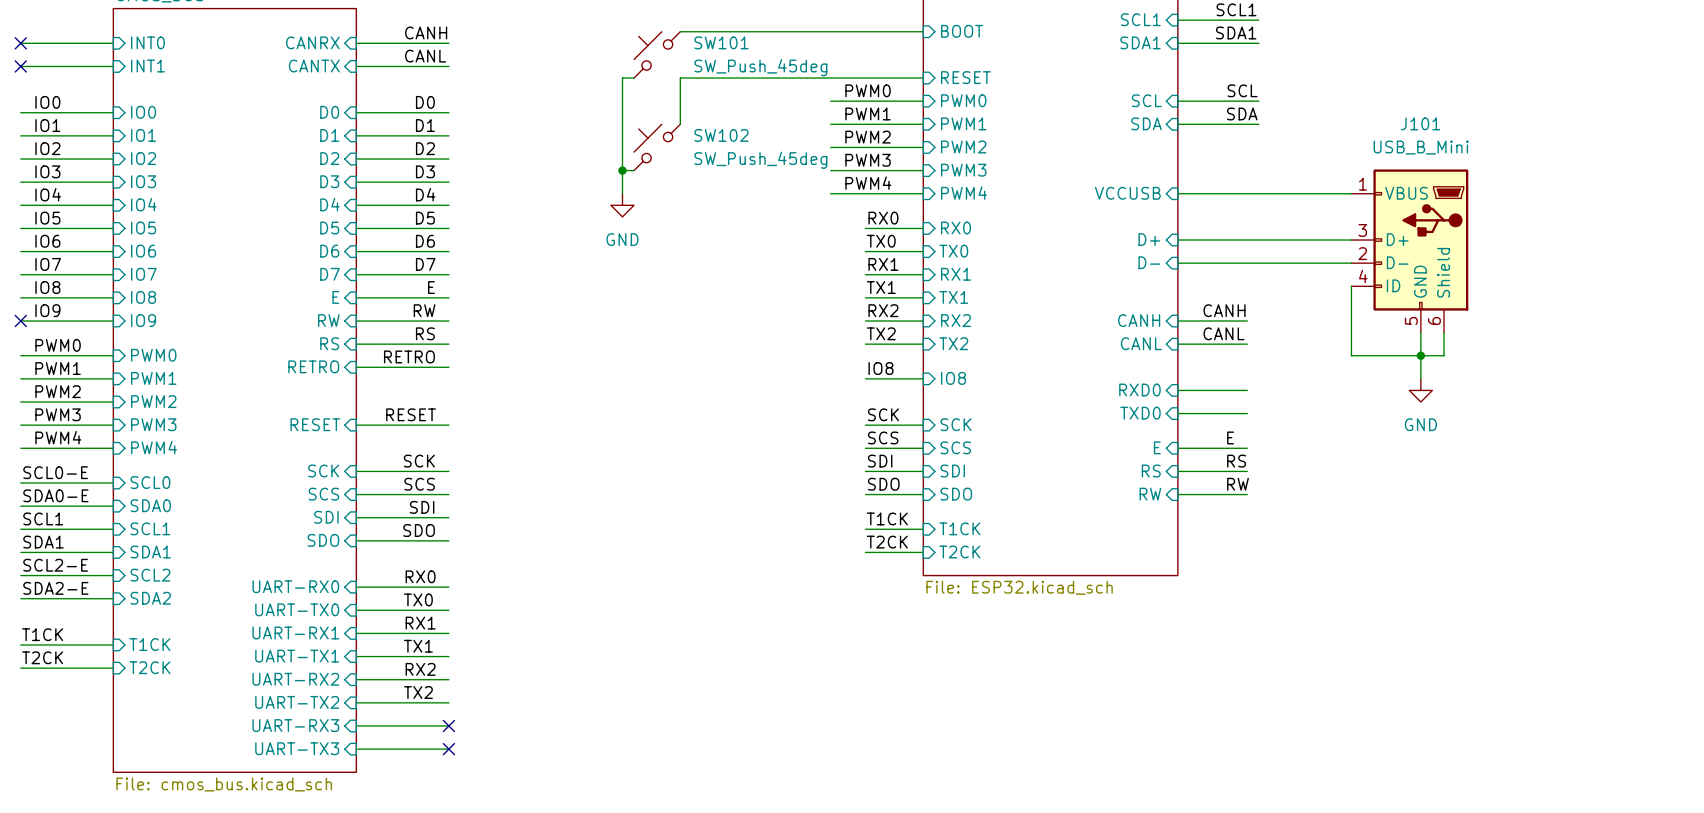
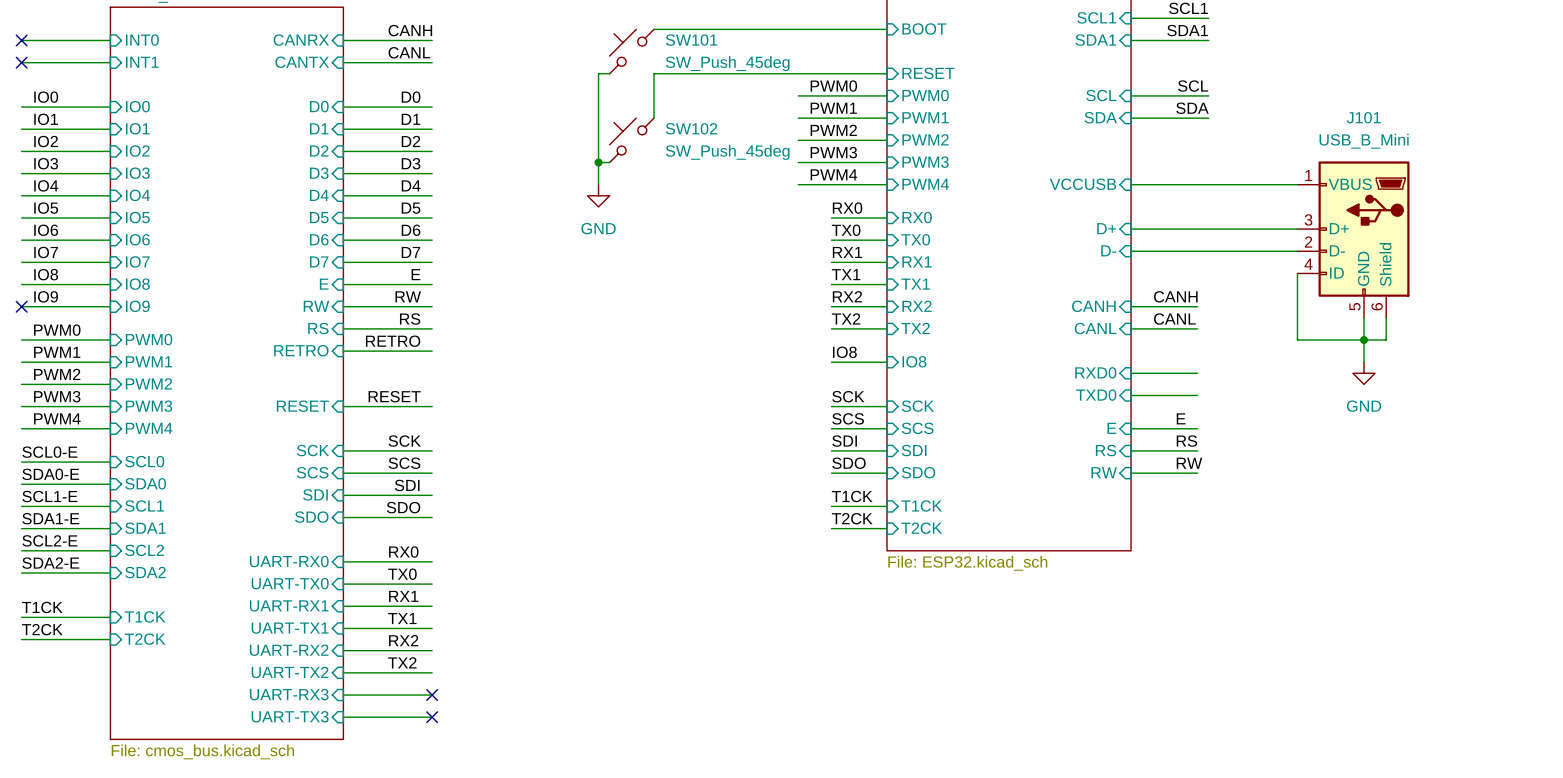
label: SCL1 (43, 518) -> SCL1-E (49, 496)
label: SDA1 (43, 542) -> SDA1-E (50, 518)

